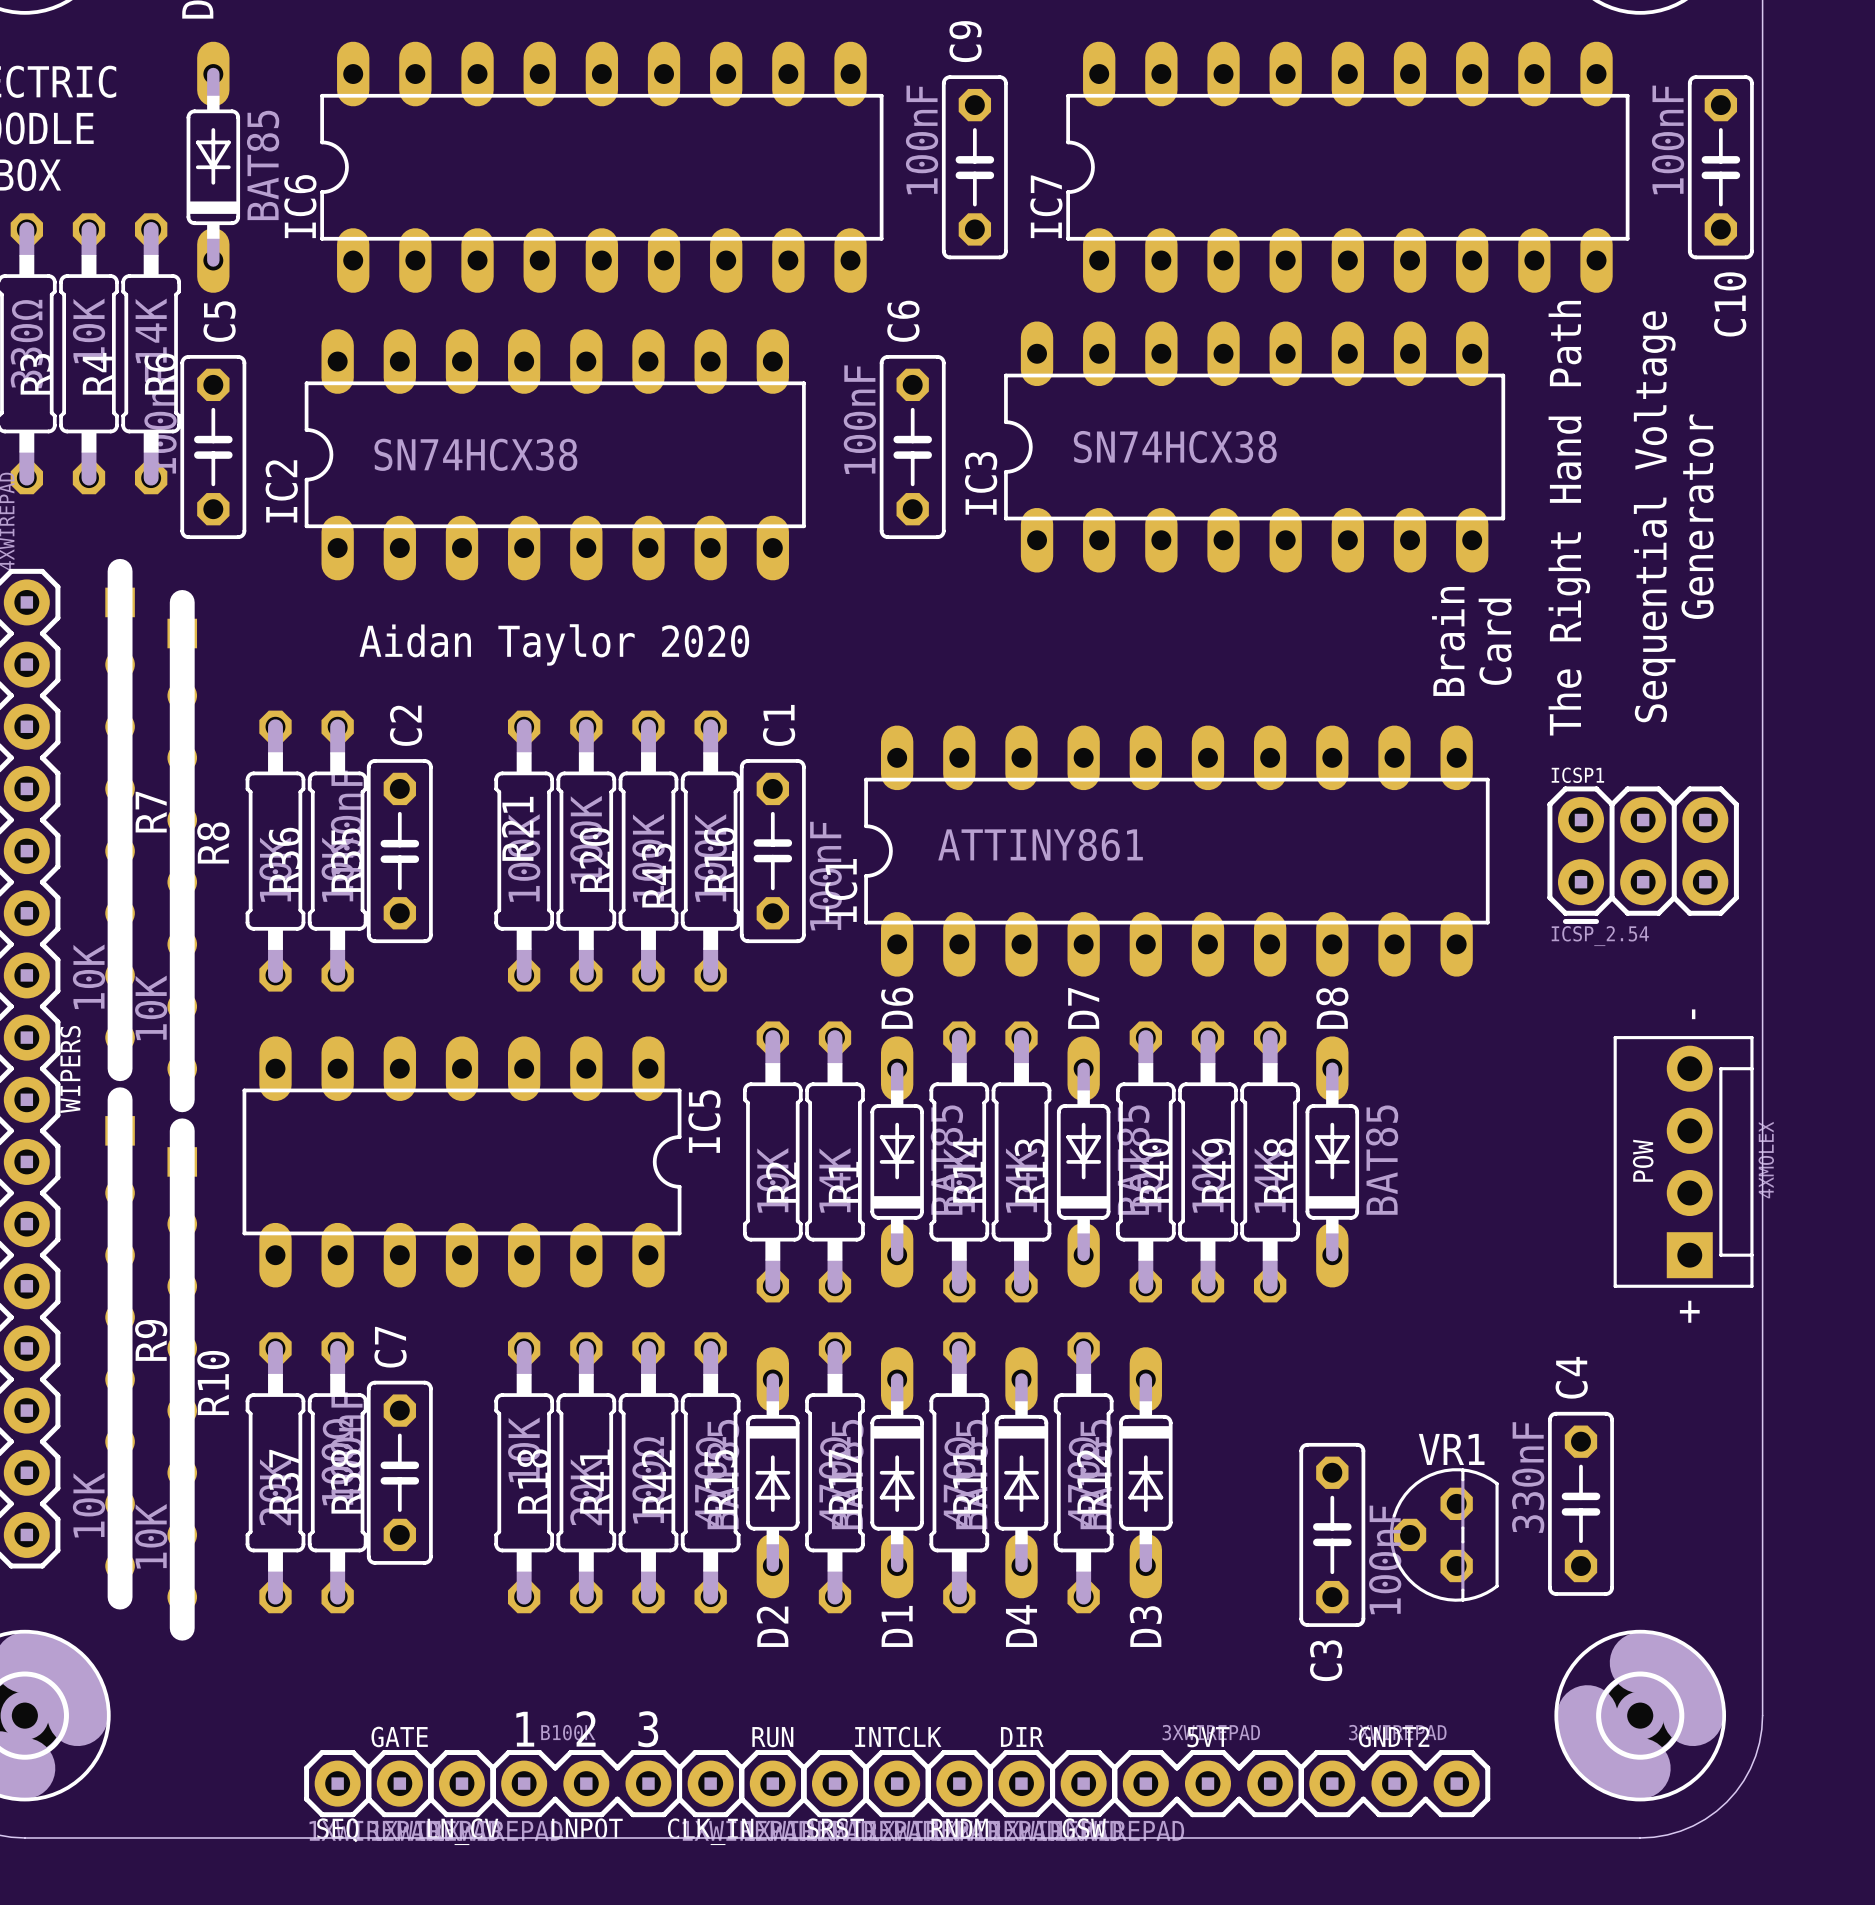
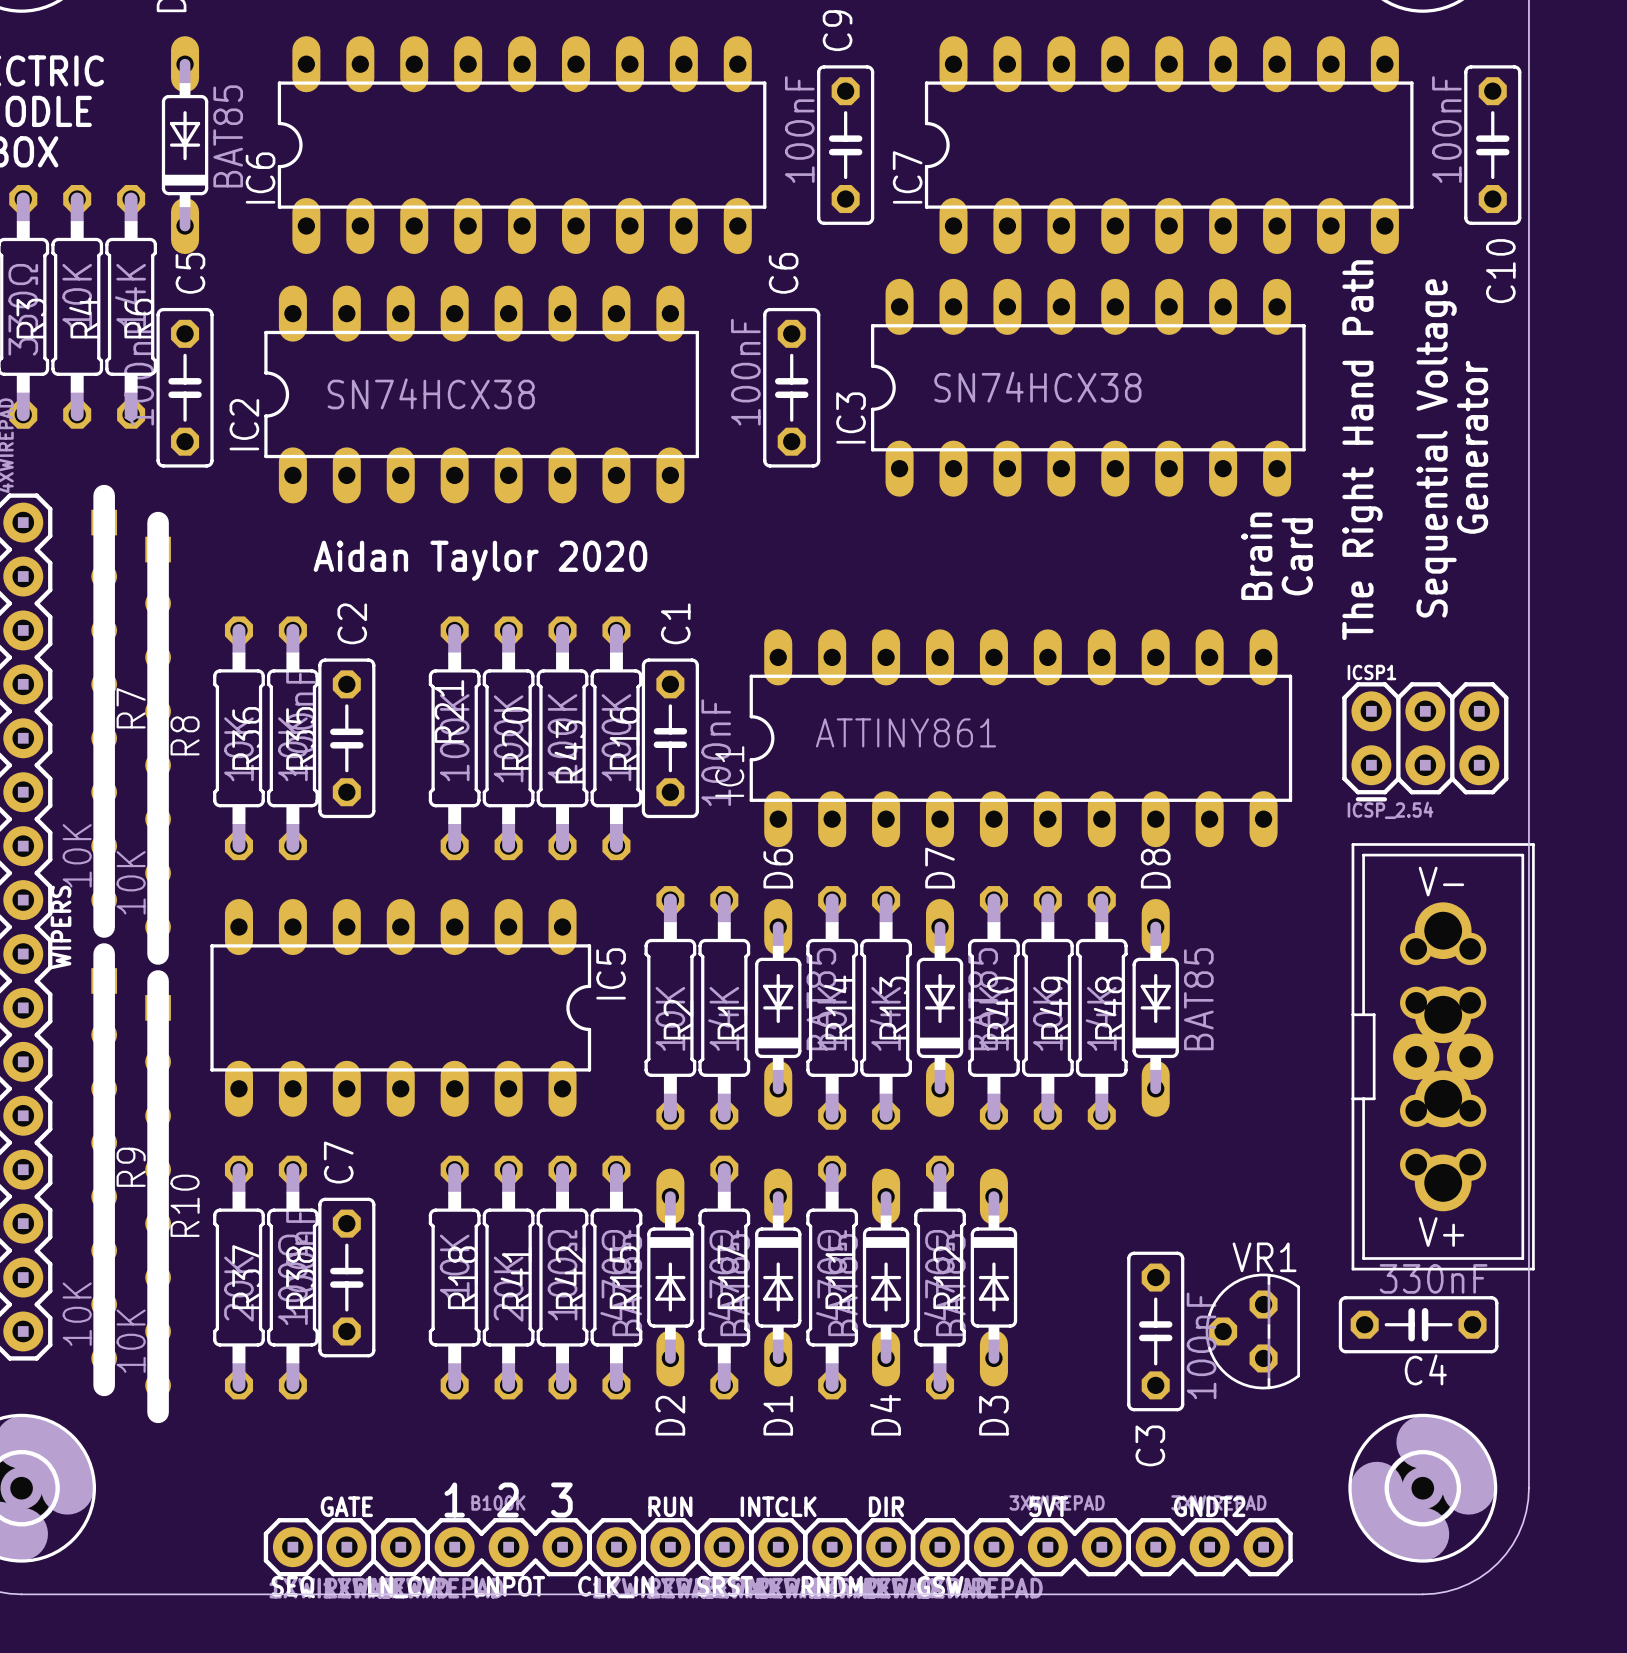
text: - (1693, 1014) -> none
POW: 4XMOLEX (1683, 1161) -> none
part: none -> (1443, 1056)
text: + (1689, 1311) -> none
C4 name position: C4 (1571, 1377) -> C4 (1425, 1369)
C4 rotation: 0° (1580, 1503) -> 90° clockwise (1418, 1324)

